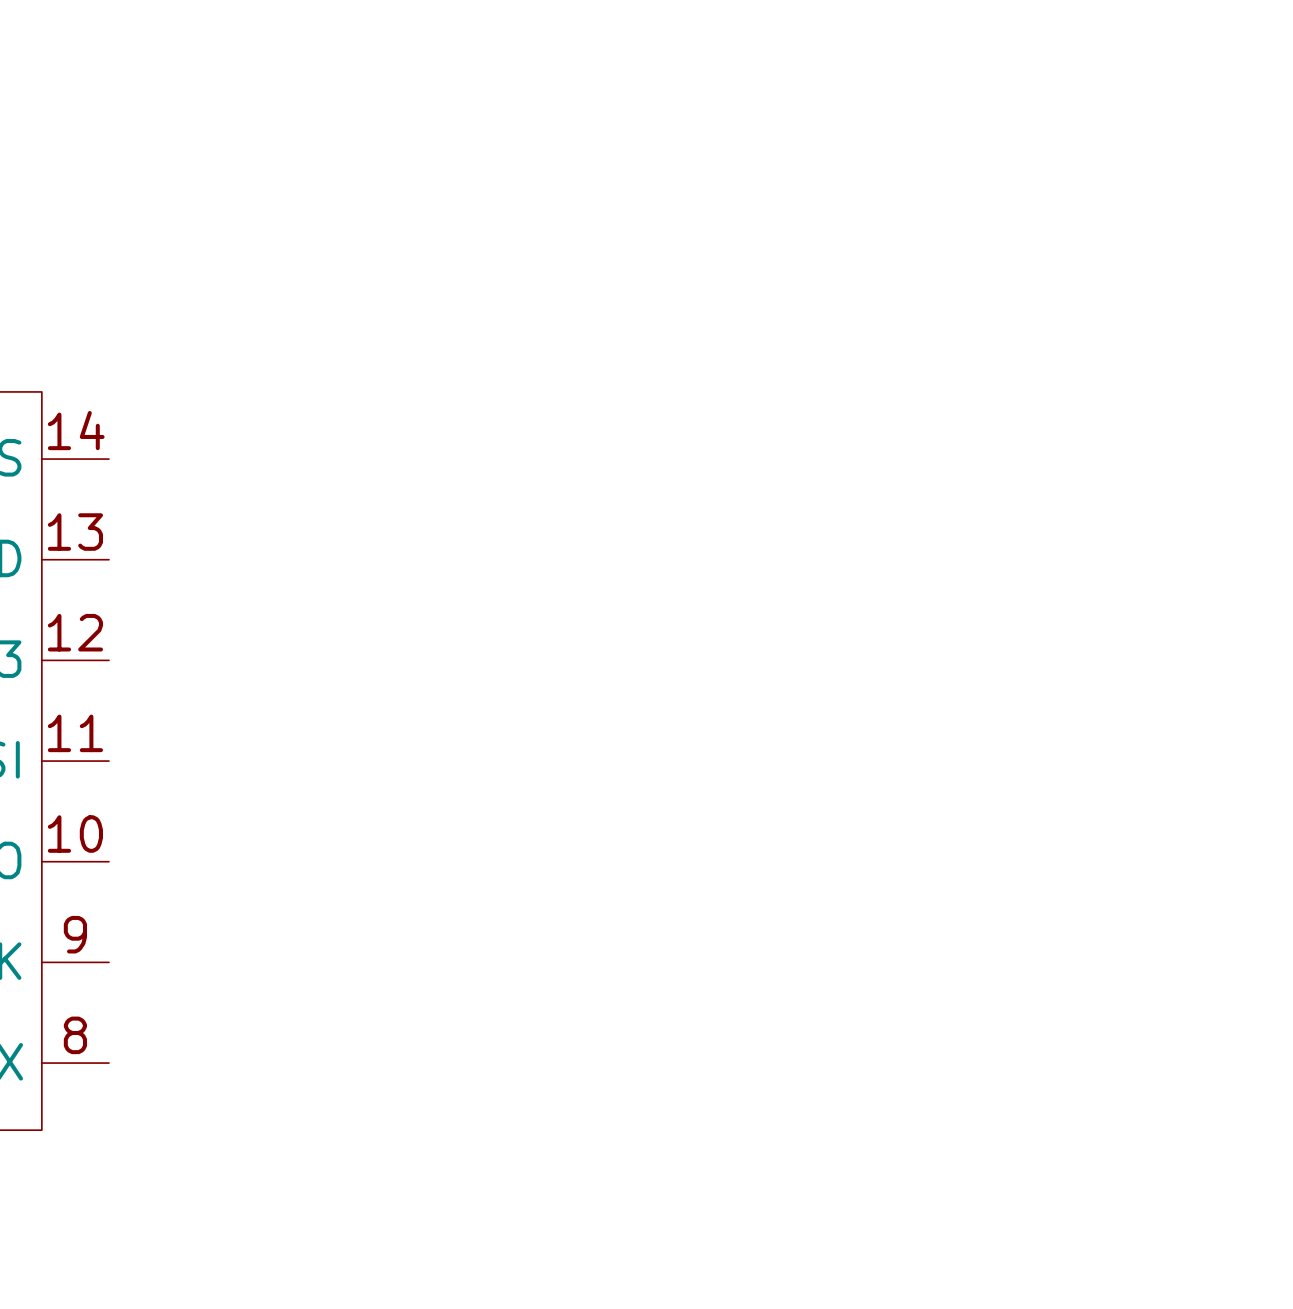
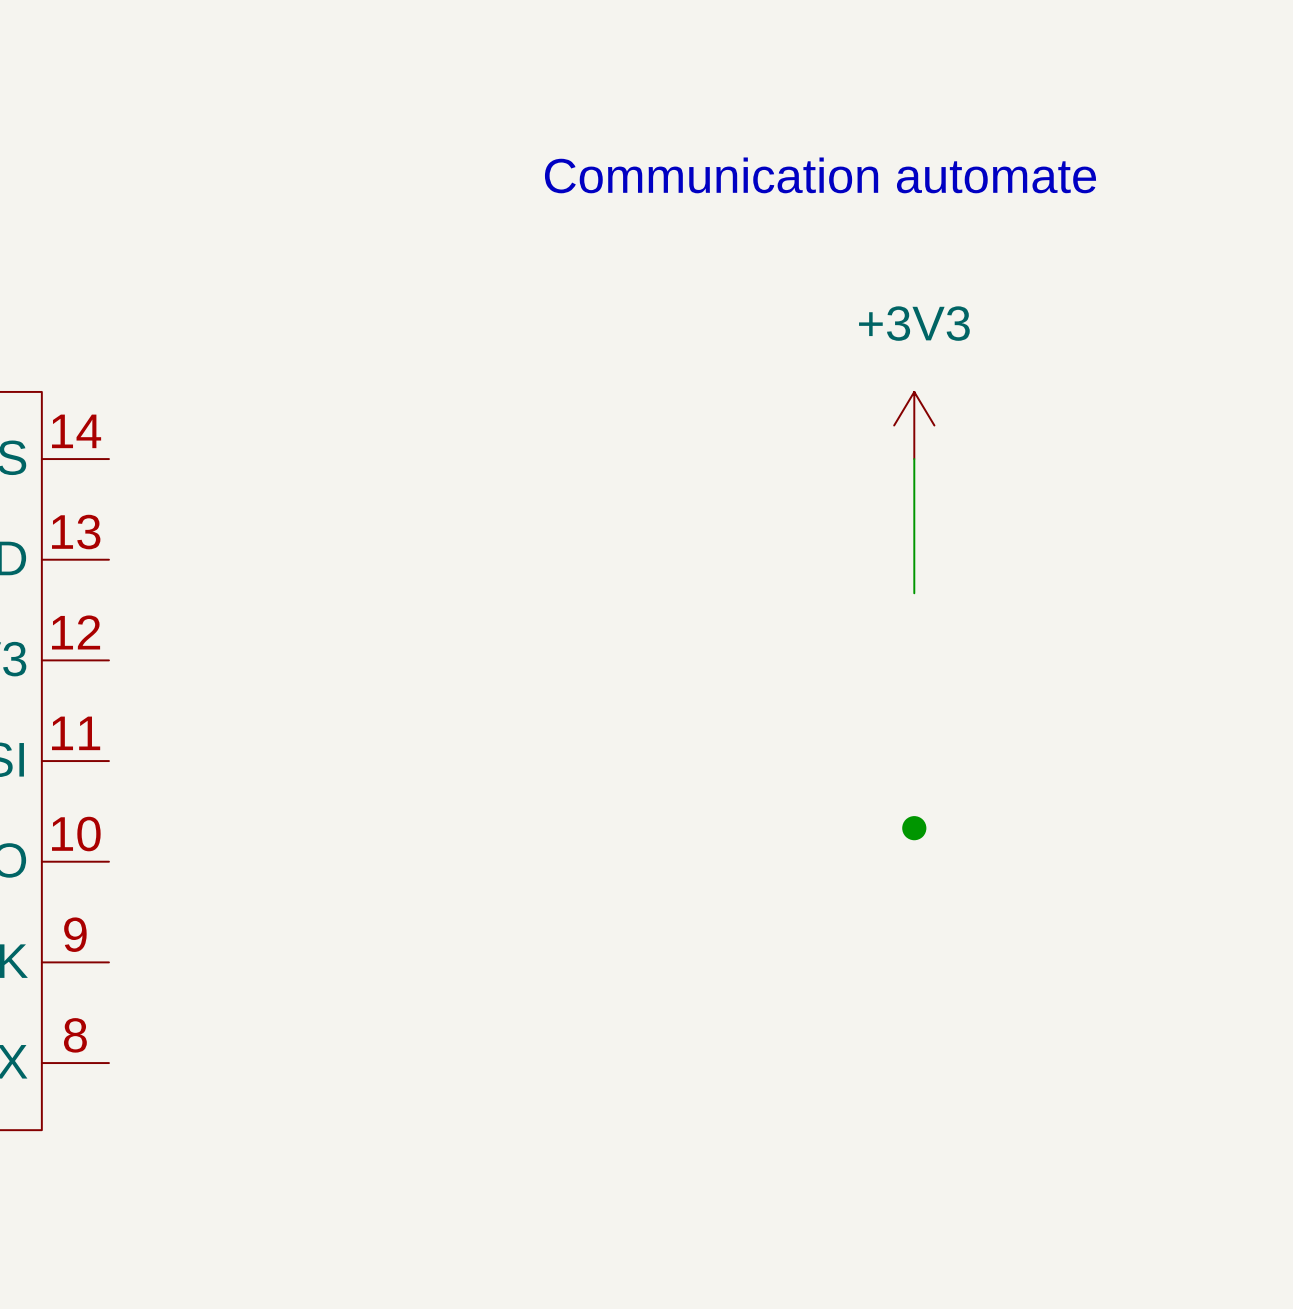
text: none -> Communication automate (820, 175)
power symbol: none -> +3V3 (914, 425)
wire: none -> (914, 459) (914, 593)
junction: none -> (914, 828)

